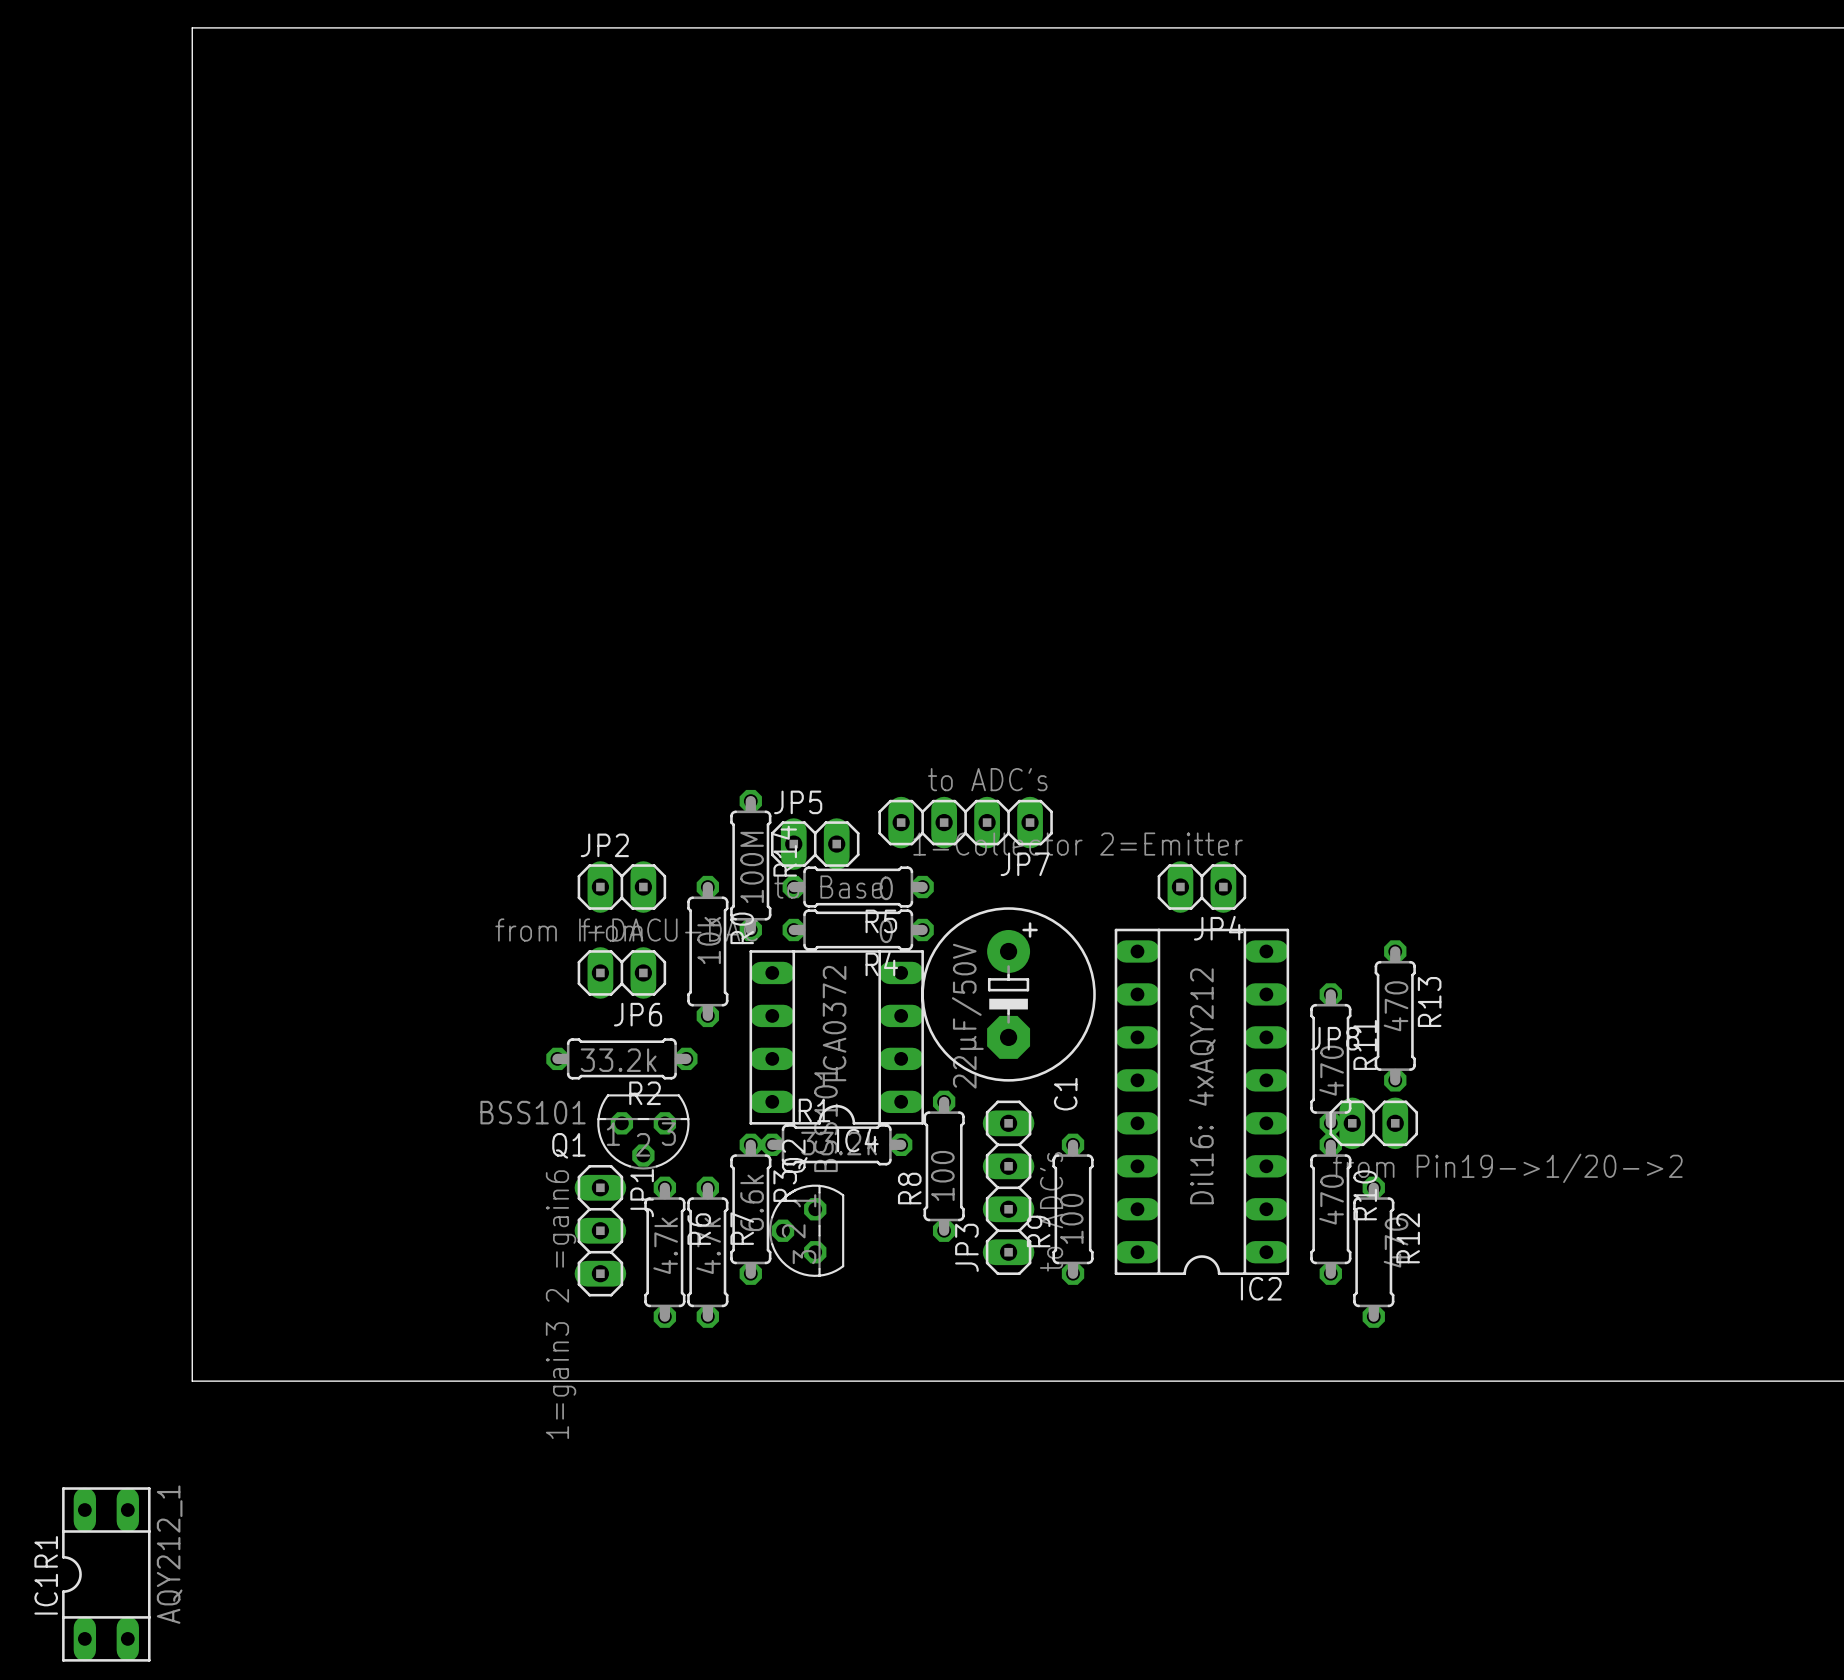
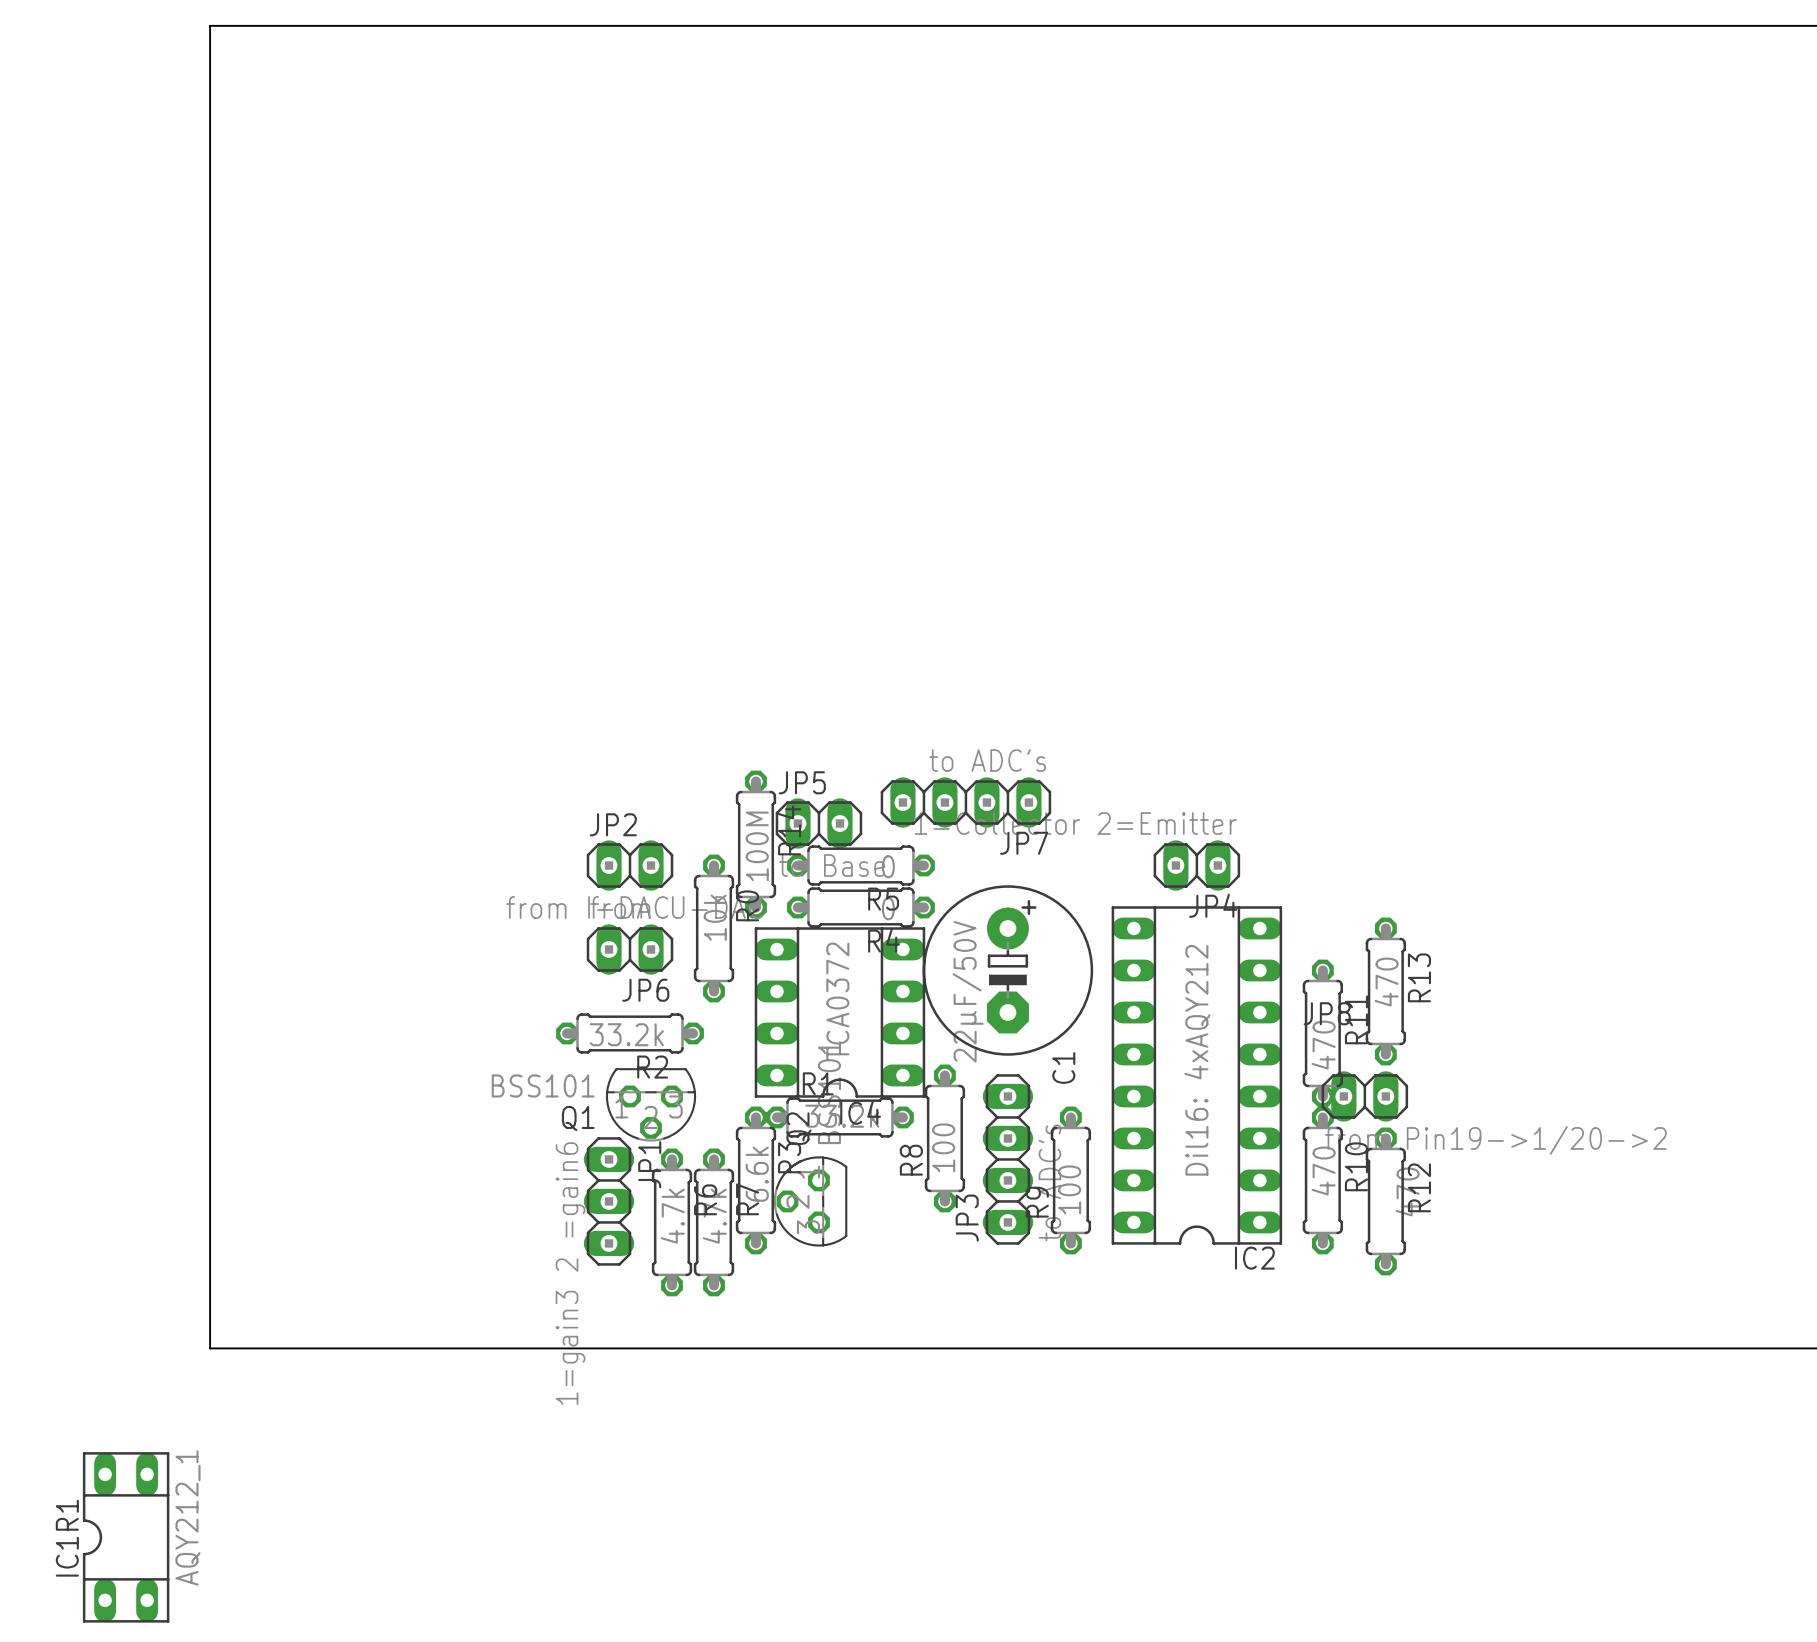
R12 position: (1373, 1252) -> (1385, 1201)

